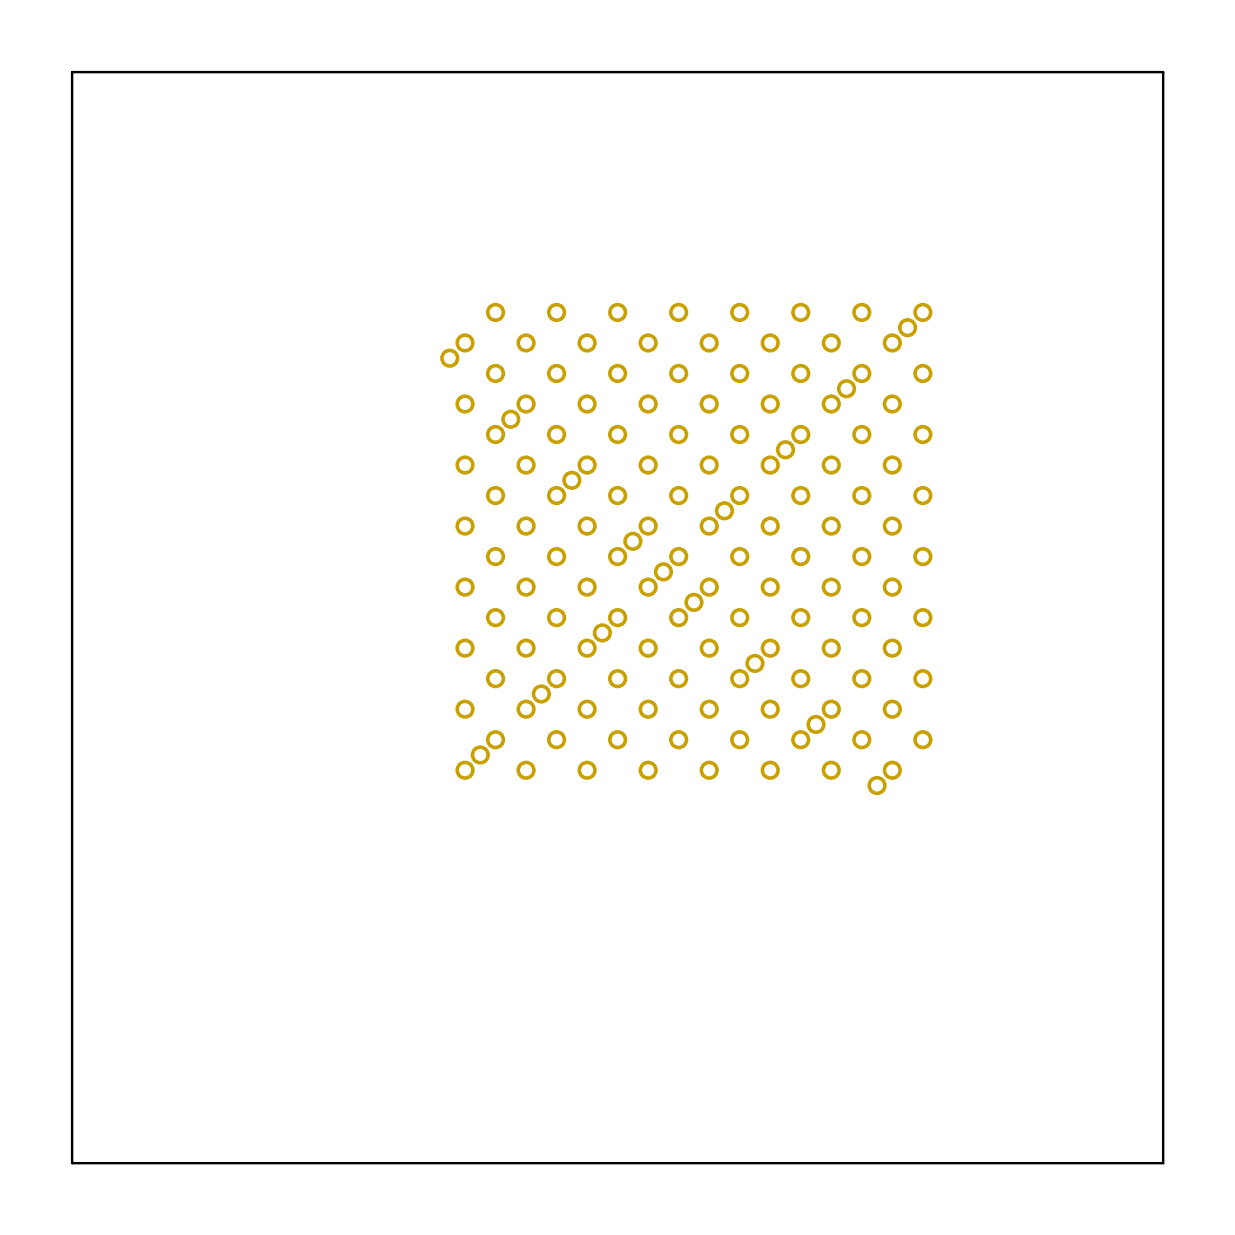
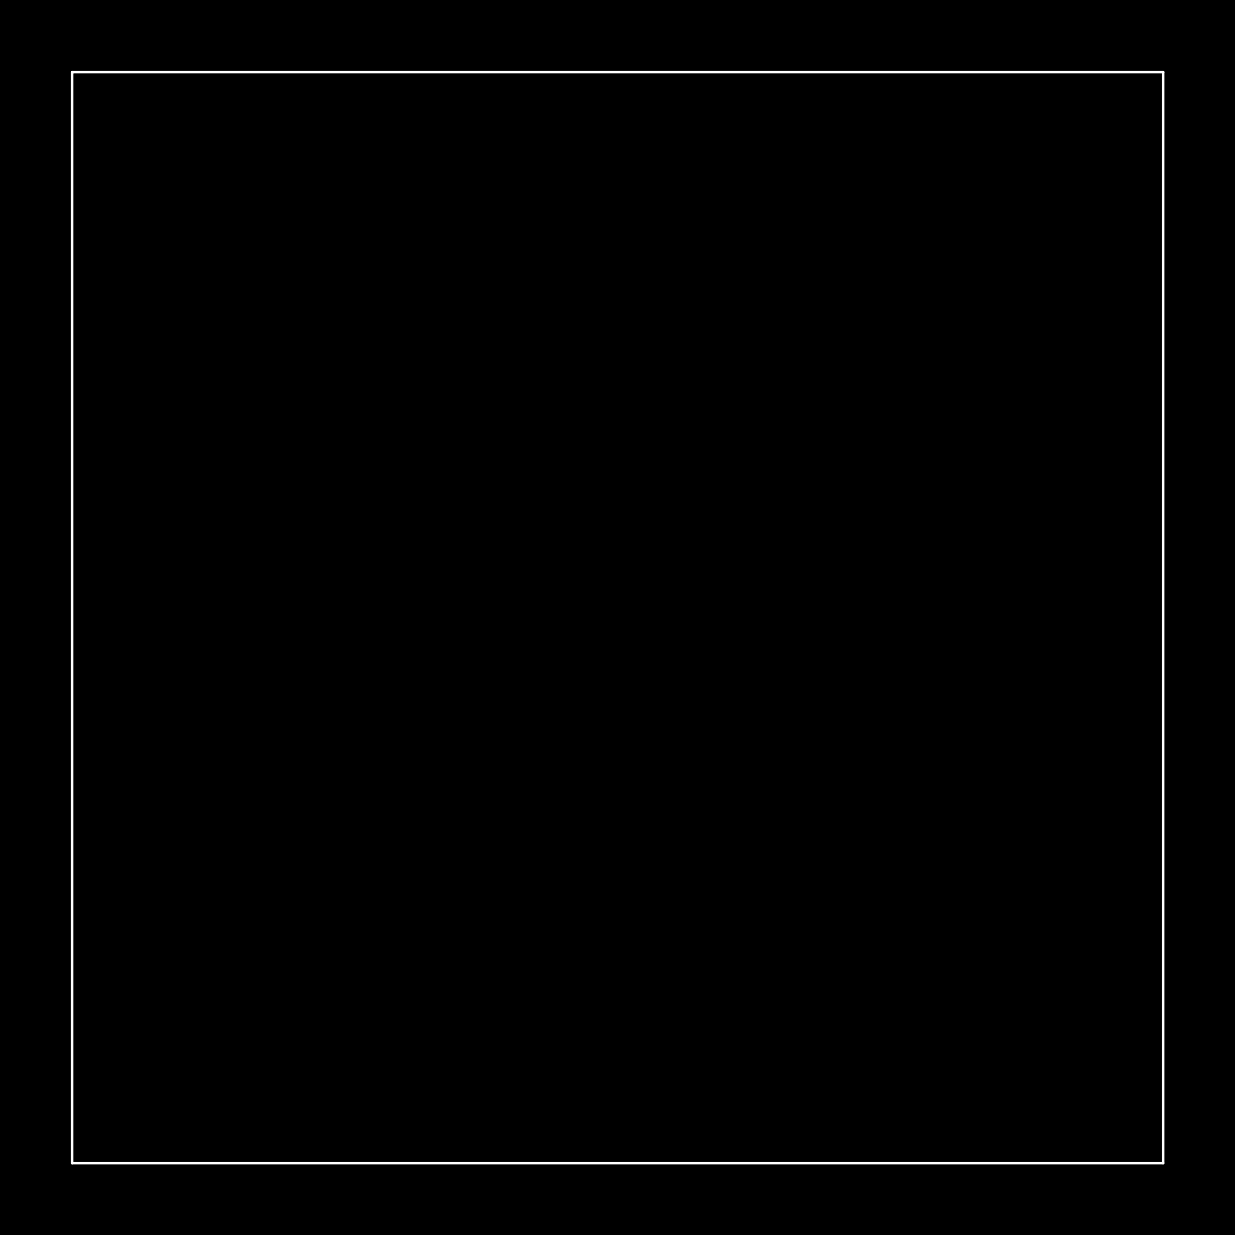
part: (495, 312) -> none
part: (556, 312) -> none
part: (617, 312) -> none
part: (678, 312) -> none
part: (739, 312) -> none
part: (800, 312) -> none
part: (861, 312) -> none
part: (922, 312) -> none
part: (907, 327) -> none
part: (465, 342) -> none
part: (526, 342) -> none
part: (587, 342) -> none
part: (648, 342) -> none
part: (709, 342) -> none
part: (770, 342) -> none
part: (831, 342) -> none
part: (892, 342) -> none
part: (449, 358) -> none
part: (495, 373) -> none
part: (556, 373) -> none
part: (617, 373) -> none
part: (678, 373) -> none
part: (739, 373) -> none
part: (800, 373) -> none
part: (861, 373) -> none
part: (922, 373) -> none
part: (846, 388) -> none
part: (465, 403) -> none
part: (526, 403) -> none
part: (587, 403) -> none
part: (648, 403) -> none
part: (709, 403) -> none
part: (770, 403) -> none
part: (831, 403) -> none
part: (892, 403) -> none
part: (510, 419) -> none
part: (495, 434) -> none
part: (556, 434) -> none
part: (617, 434) -> none
part: (678, 434) -> none
part: (739, 434) -> none
part: (800, 434) -> none
part: (861, 434) -> none
part: (922, 434) -> none
part: (785, 449) -> none
part: (465, 465) -> none
part: (526, 465) -> none
part: (587, 465) -> none
part: (648, 465) -> none
part: (709, 465) -> none
part: (770, 465) -> none
part: (831, 465) -> none
part: (892, 465) -> none
part: (571, 480) -> none
part: (495, 495) -> none
part: (556, 495) -> none
part: (617, 495) -> none
part: (678, 495) -> none
part: (739, 495) -> none
part: (800, 495) -> none
part: (861, 495) -> none
part: (922, 495) -> none
part: (724, 510) -> none
part: (465, 526) -> none
part: (526, 526) -> none
part: (587, 526) -> none
part: (648, 526) -> none
part: (709, 526) -> none
part: (770, 526) -> none
part: (831, 526) -> none
part: (892, 526) -> none
part: (632, 541) -> none
part: (495, 556) -> none
part: (556, 556) -> none
part: (617, 556) -> none
part: (678, 556) -> none
part: (739, 556) -> none
part: (800, 556) -> none
part: (861, 556) -> none
part: (922, 556) -> none
part: (663, 571) -> none
part: (465, 587) -> none
part: (526, 587) -> none
part: (587, 587) -> none
part: (648, 587) -> none
part: (709, 587) -> none
part: (770, 587) -> none
part: (831, 587) -> none
part: (892, 587) -> none
part: (693, 602) -> none
part: (495, 617) -> none
part: (556, 617) -> none
part: (617, 617) -> none
part: (678, 617) -> none
part: (739, 617) -> none
part: (800, 617) -> none
part: (861, 617) -> none
part: (922, 617) -> none
part: (602, 632) -> none
part: (465, 648) -> none
part: (526, 648) -> none
part: (587, 648) -> none
part: (648, 648) -> none
part: (709, 648) -> none
part: (770, 648) -> none
part: (831, 648) -> none
part: (892, 648) -> none
part: (754, 663) -> none
part: (495, 678) -> none
part: (556, 678) -> none
part: (617, 678) -> none
part: (678, 678) -> none
part: (739, 678) -> none
part: (800, 678) -> none
part: (861, 678) -> none
part: (922, 678) -> none
part: (541, 693) -> none
part: (465, 709) -> none
part: (526, 709) -> none
part: (587, 709) -> none
part: (648, 709) -> none
part: (709, 709) -> none
part: (770, 709) -> none
part: (831, 709) -> none
part: (892, 709) -> none
part: (816, 724) -> none
part: (495, 739) -> none
part: (556, 739) -> none
part: (617, 739) -> none
part: (678, 739) -> none
part: (739, 739) -> none
part: (800, 739) -> none
part: (861, 739) -> none
part: (922, 739) -> none
part: (480, 754) -> none
part: (465, 770) -> none
part: (526, 770) -> none
part: (587, 770) -> none
part: (648, 770) -> none
part: (709, 770) -> none
part: (770, 770) -> none
part: (831, 770) -> none
part: (892, 770) -> none
part: (877, 785) -> none

